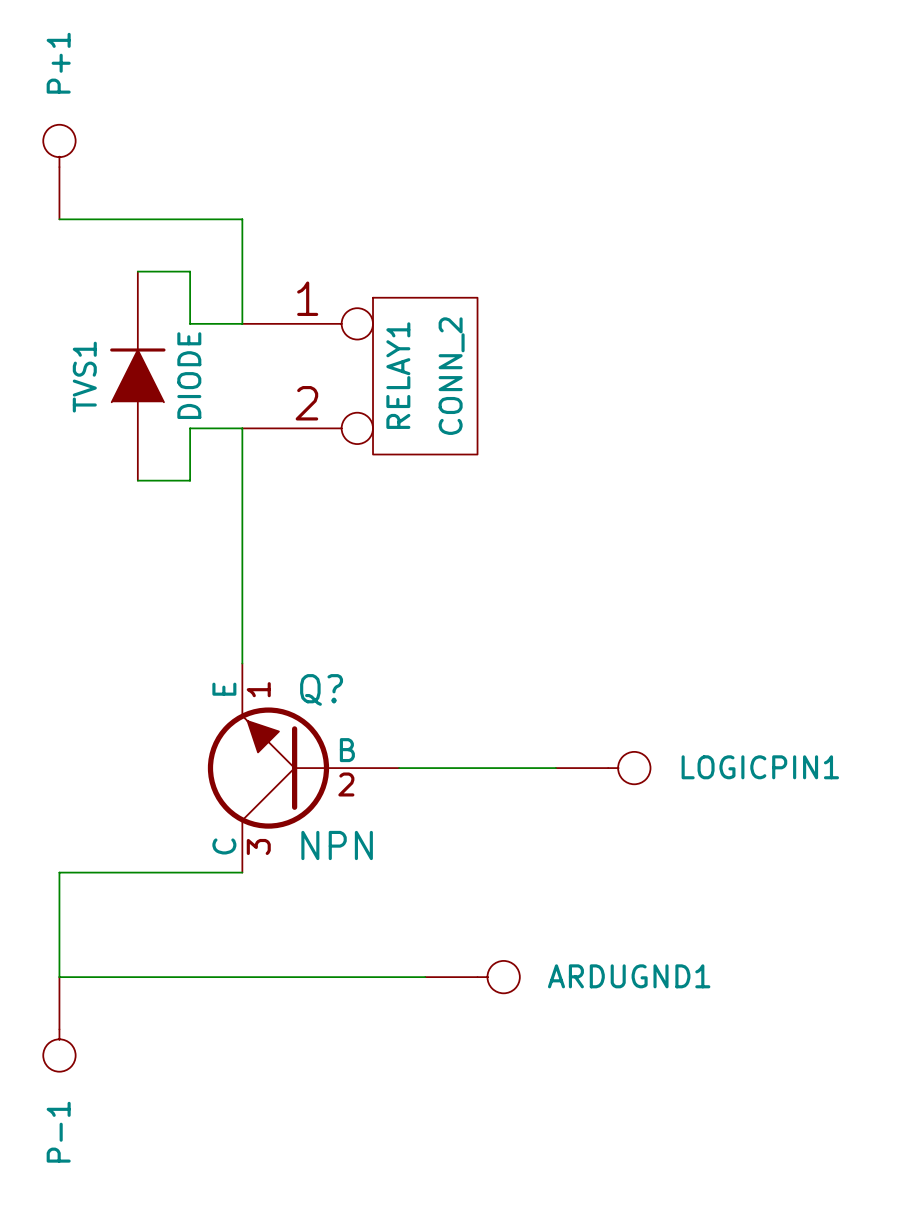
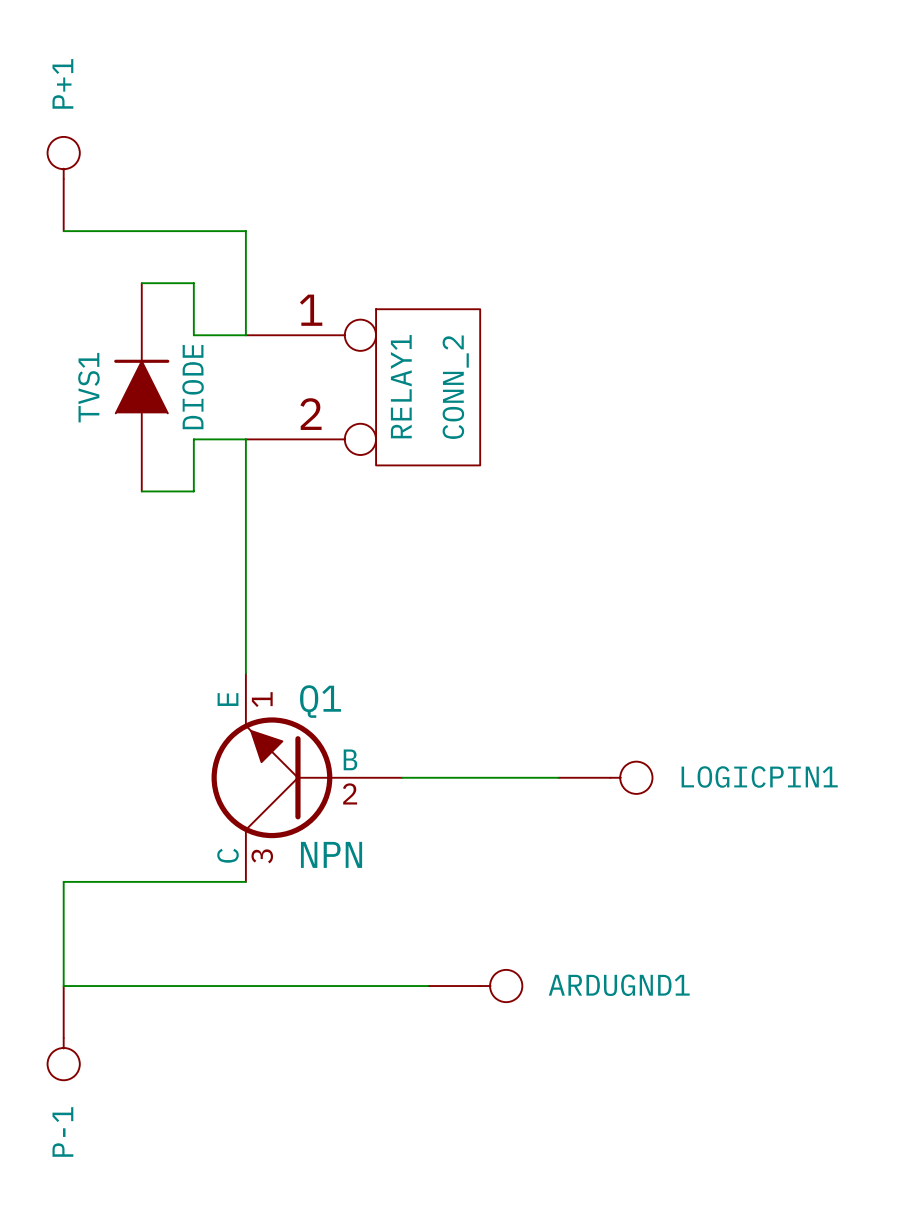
Q? name: Q? (321, 689) -> Q1 (320, 701)

